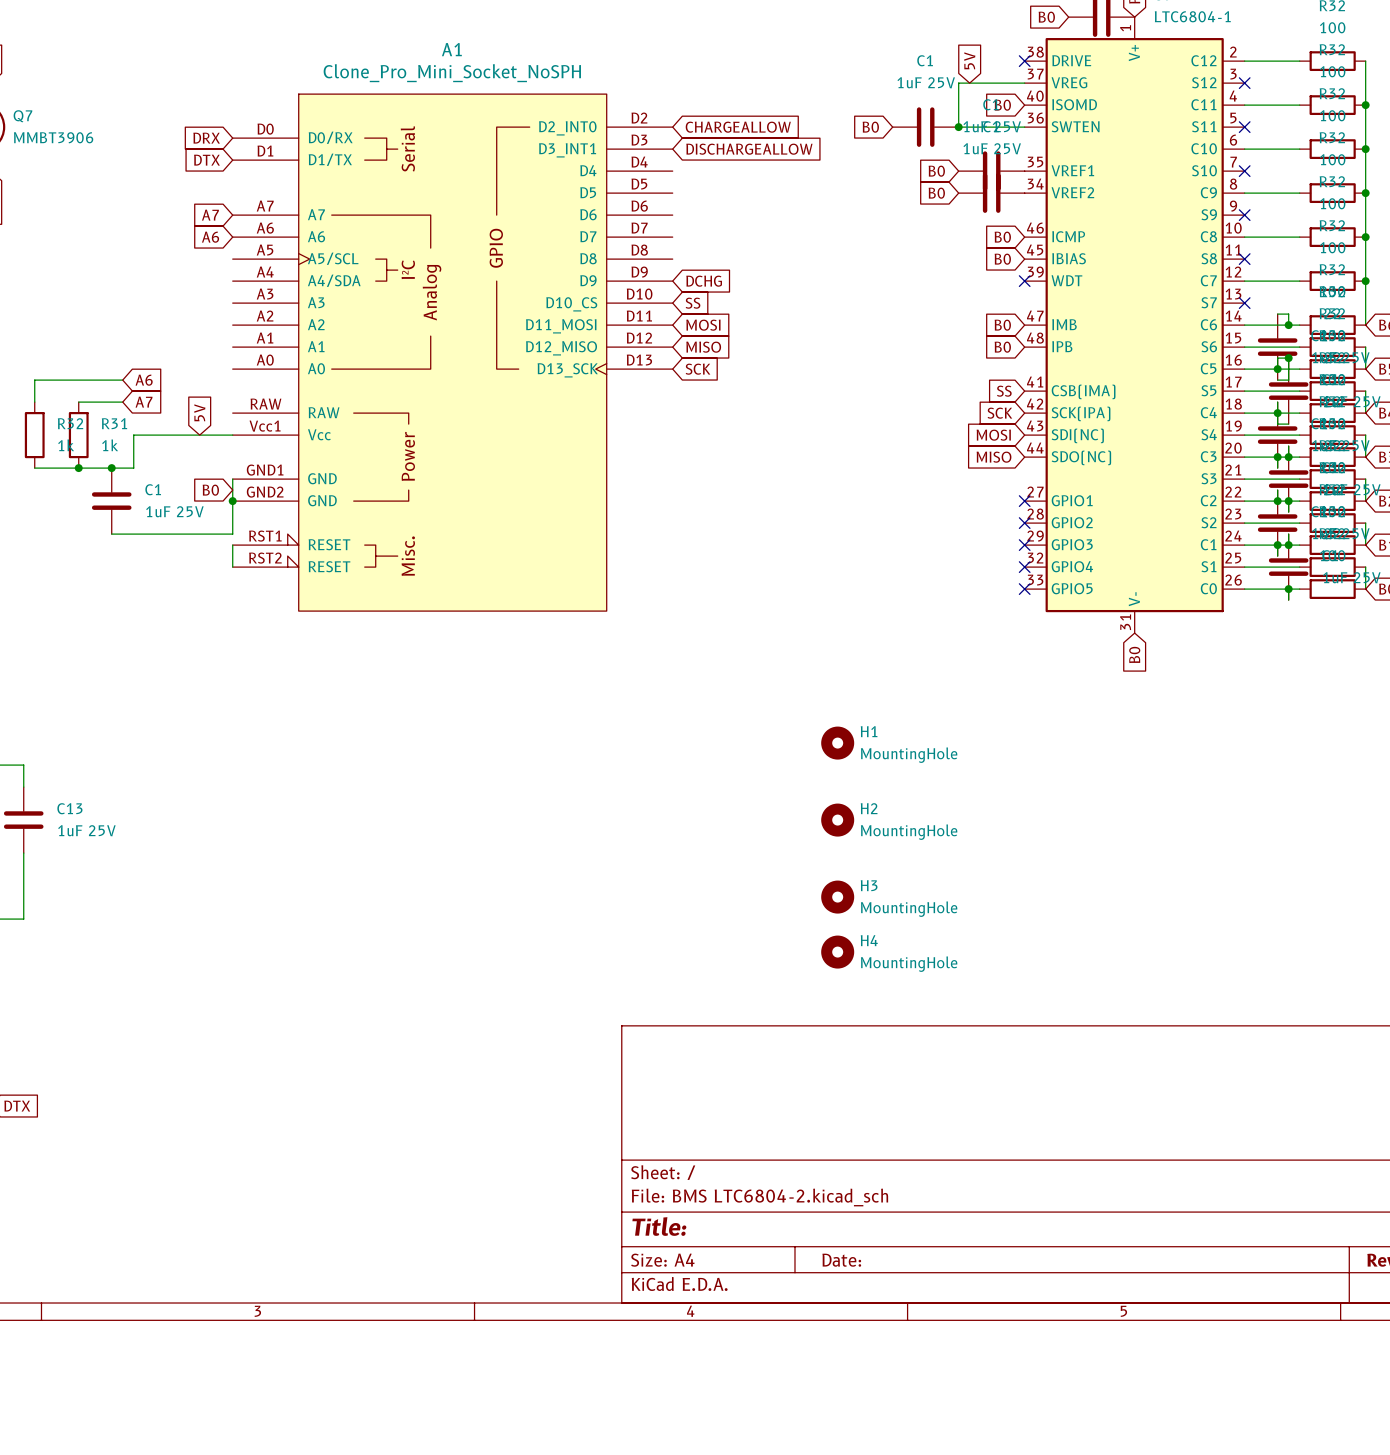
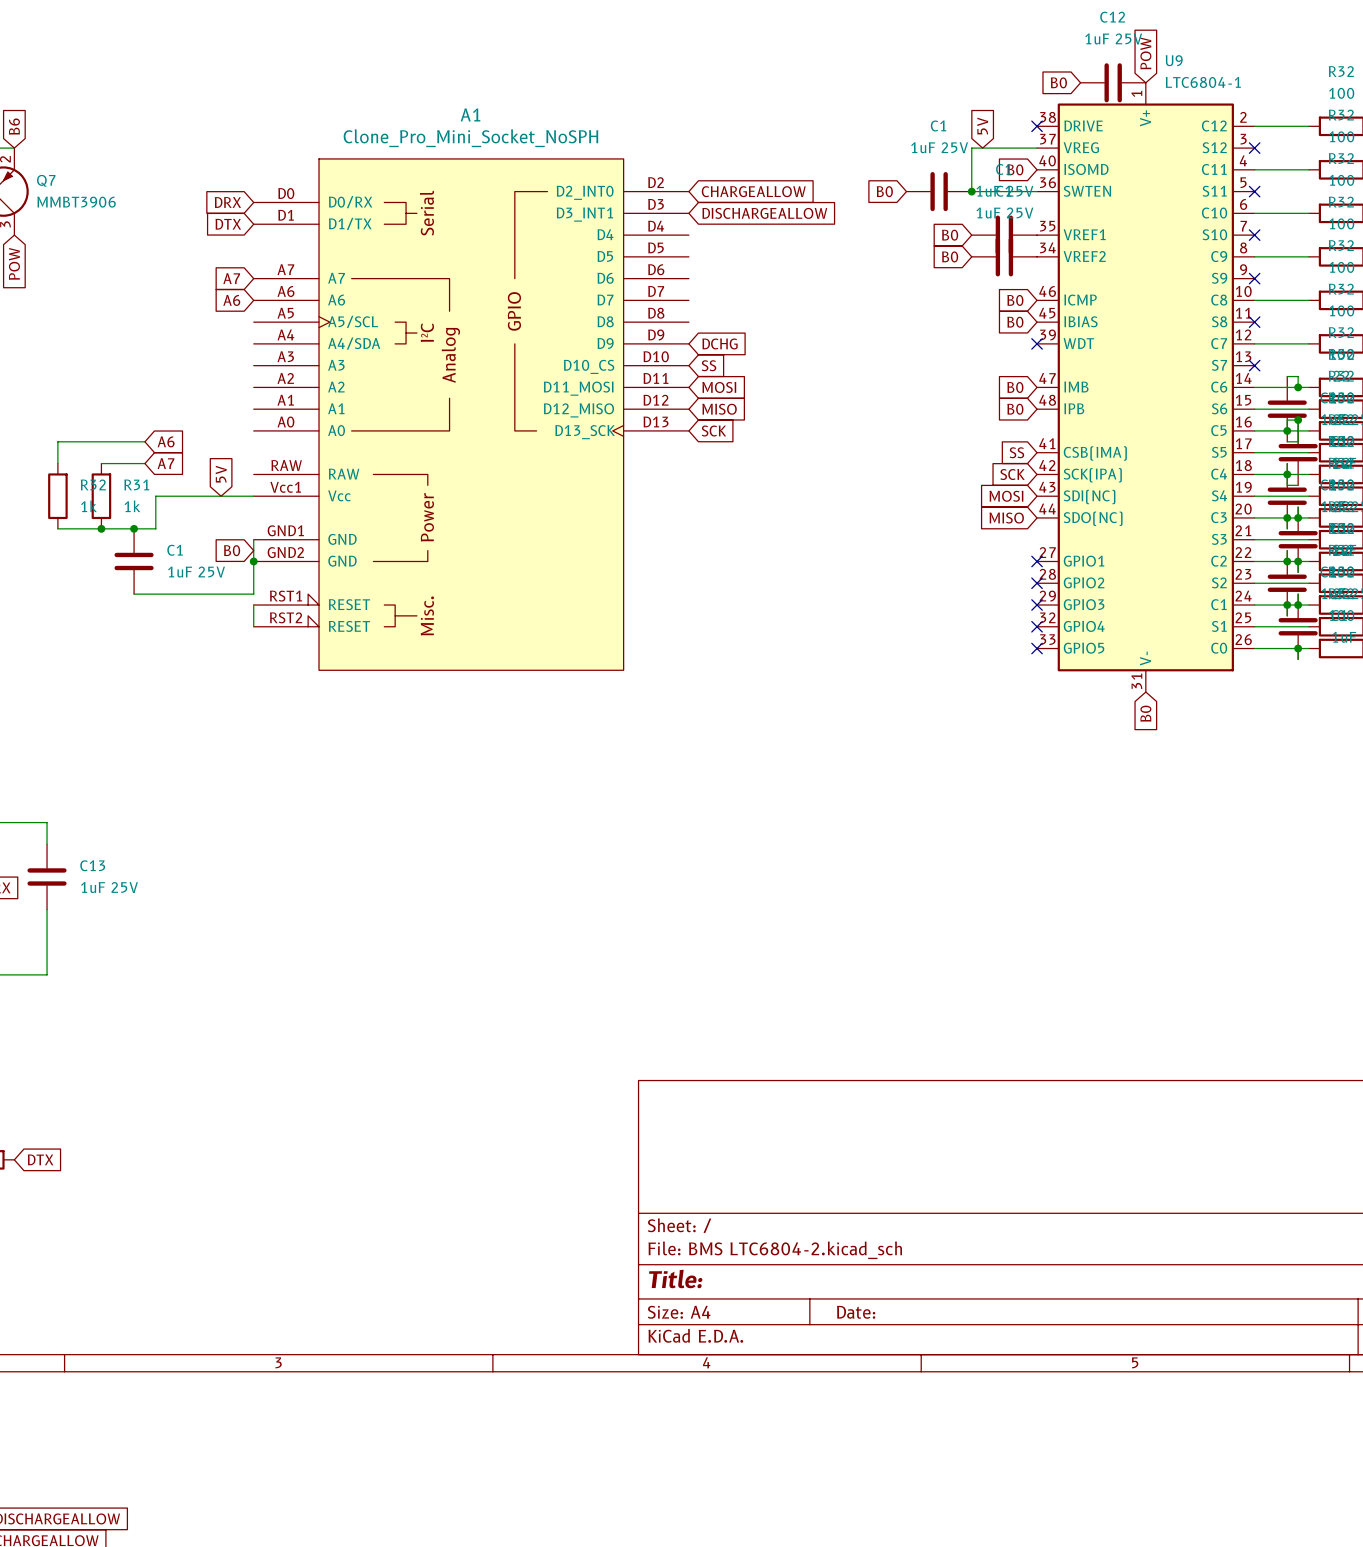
H1: MountingHole (837, 743) -> none
H2: MountingHole (837, 820) -> none
H3: MountingHole (837, 897) -> none
H4: MountingHole (837, 952) -> none

